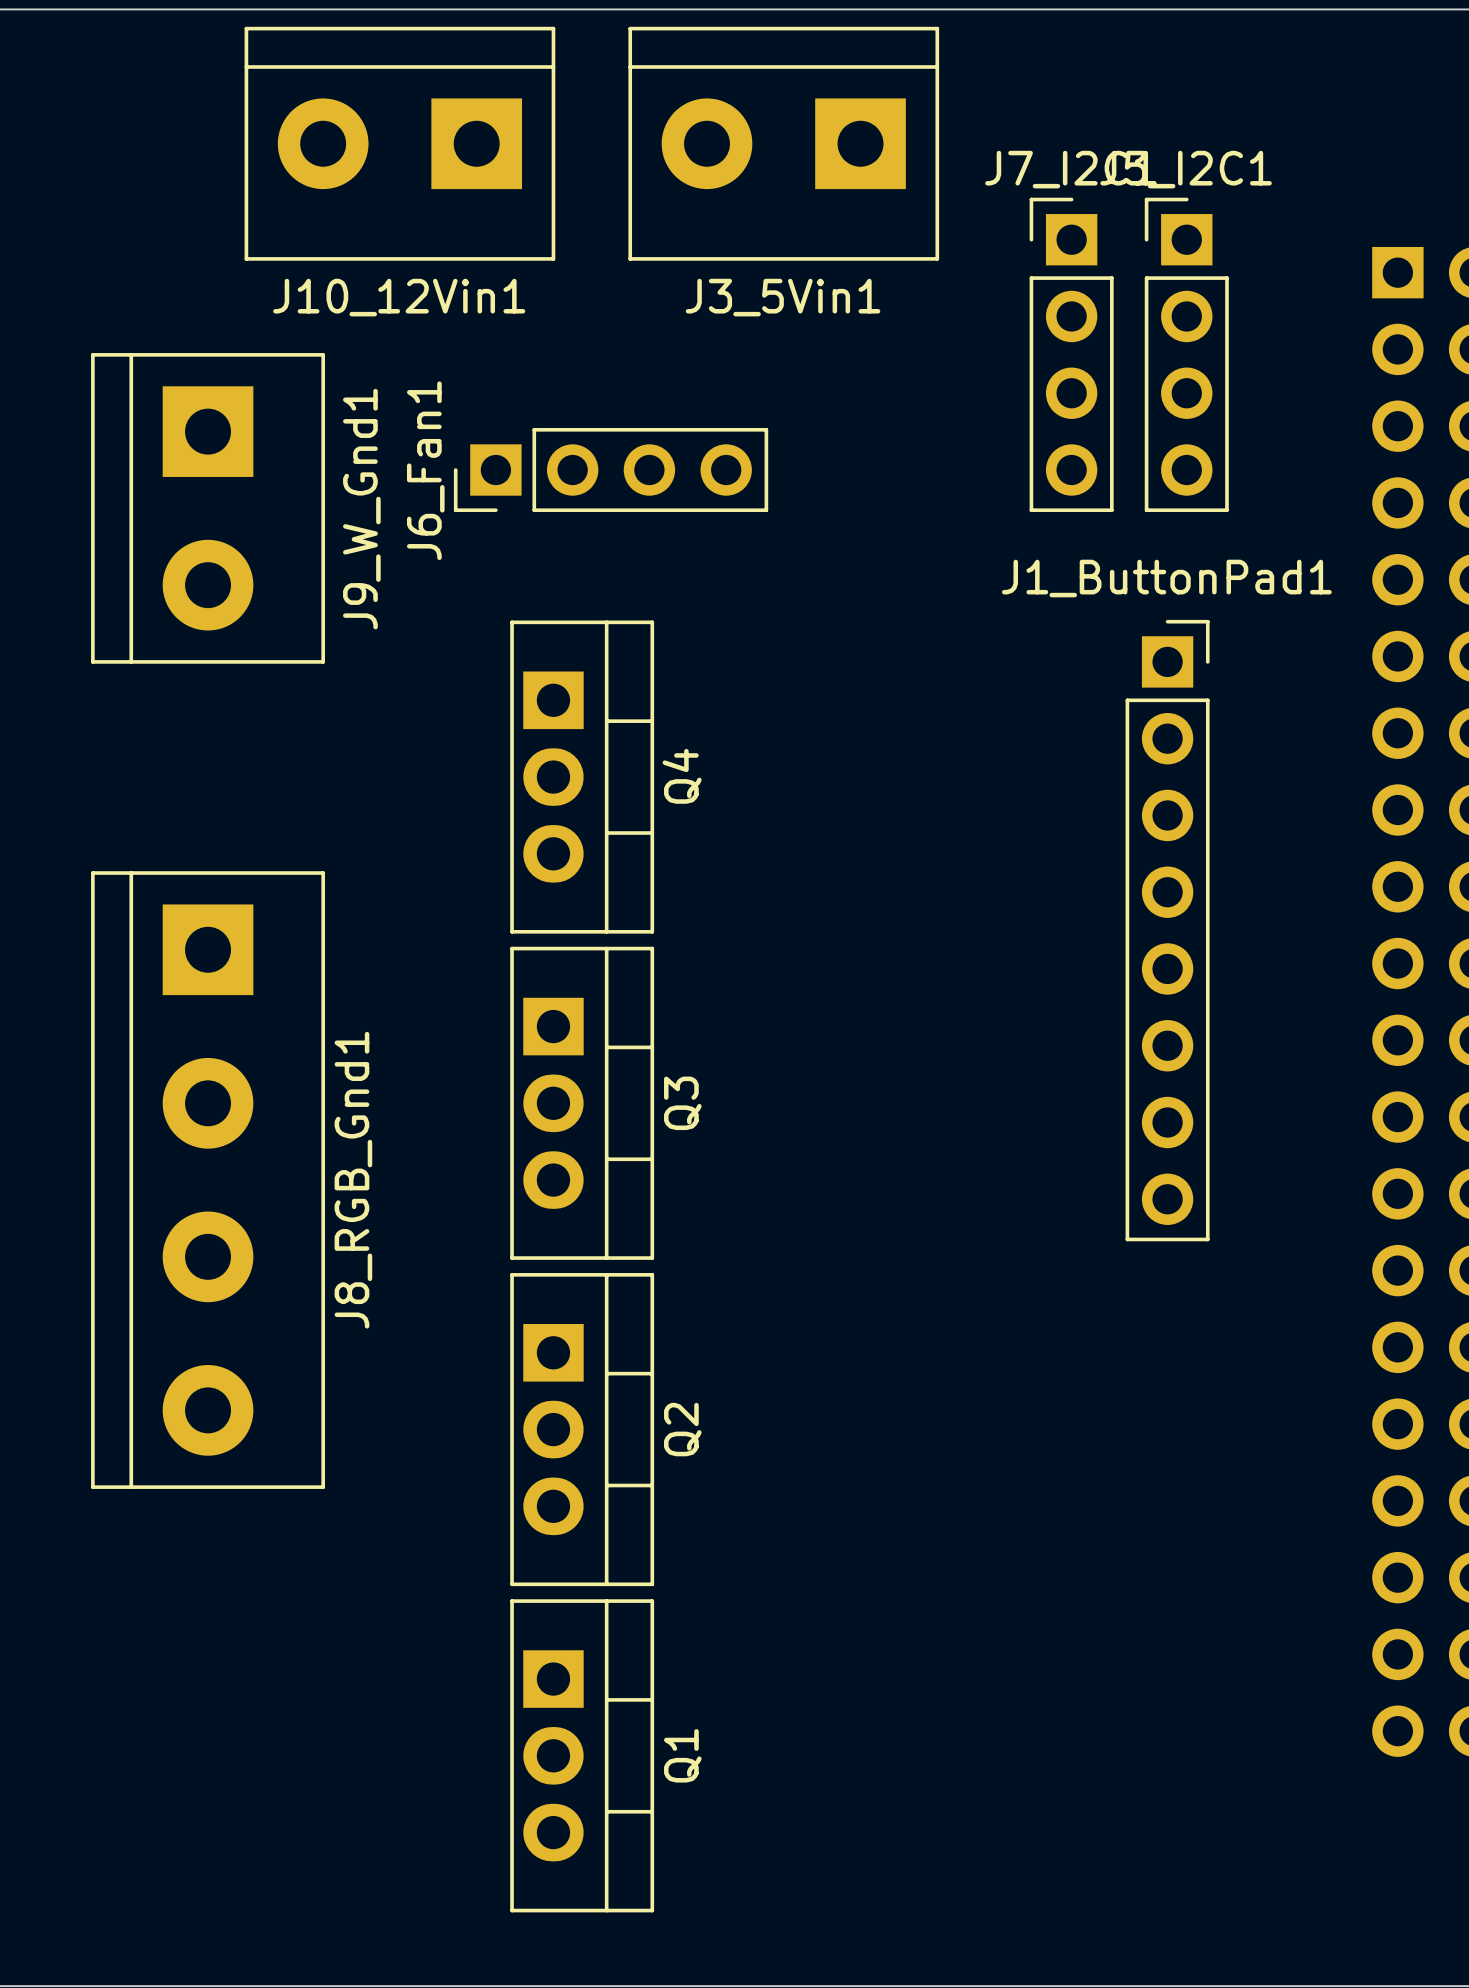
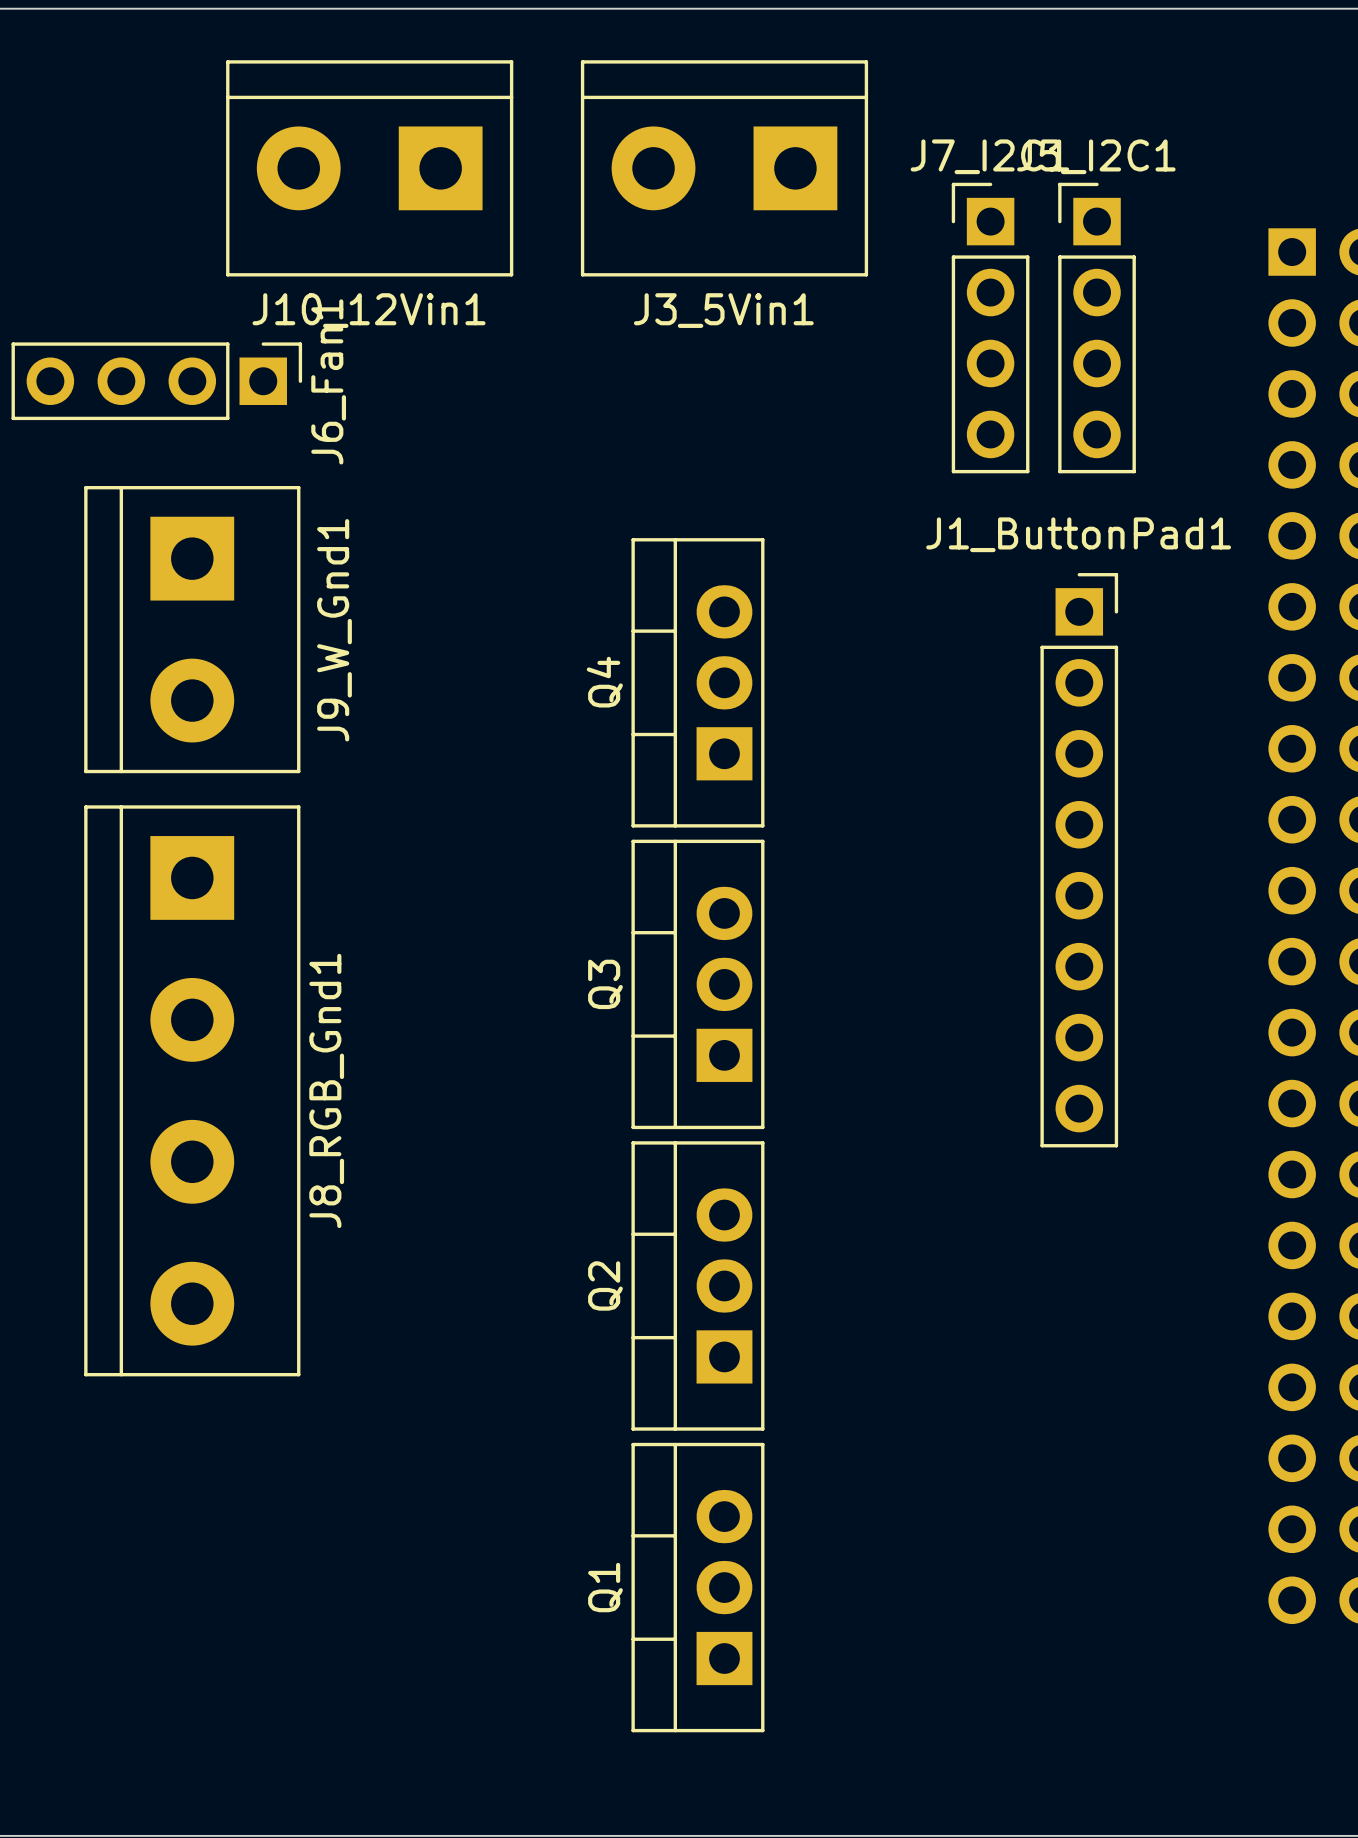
J10_12Vin1 position: (399, 143) -> (369, 168)
J3_5Vin1 position: (783, 143) -> (724, 168)
J6_Fan1 rotation: 0° (611, 470) -> 180° (156, 381)
J6_Fan1 position: (611, 470) -> (156, 381)
J9_W_Gnd1 position: (208, 508) -> (192, 629)
Q4 rotation: 0° (582, 777) -> 180° (697, 682)
Q3 rotation: 0° (582, 1103) -> 180° (697, 984)
Q2 rotation: 0° (582, 1429) -> 180° (697, 1285)
Q1 rotation: 0° (582, 1755) -> 180° (697, 1587)

